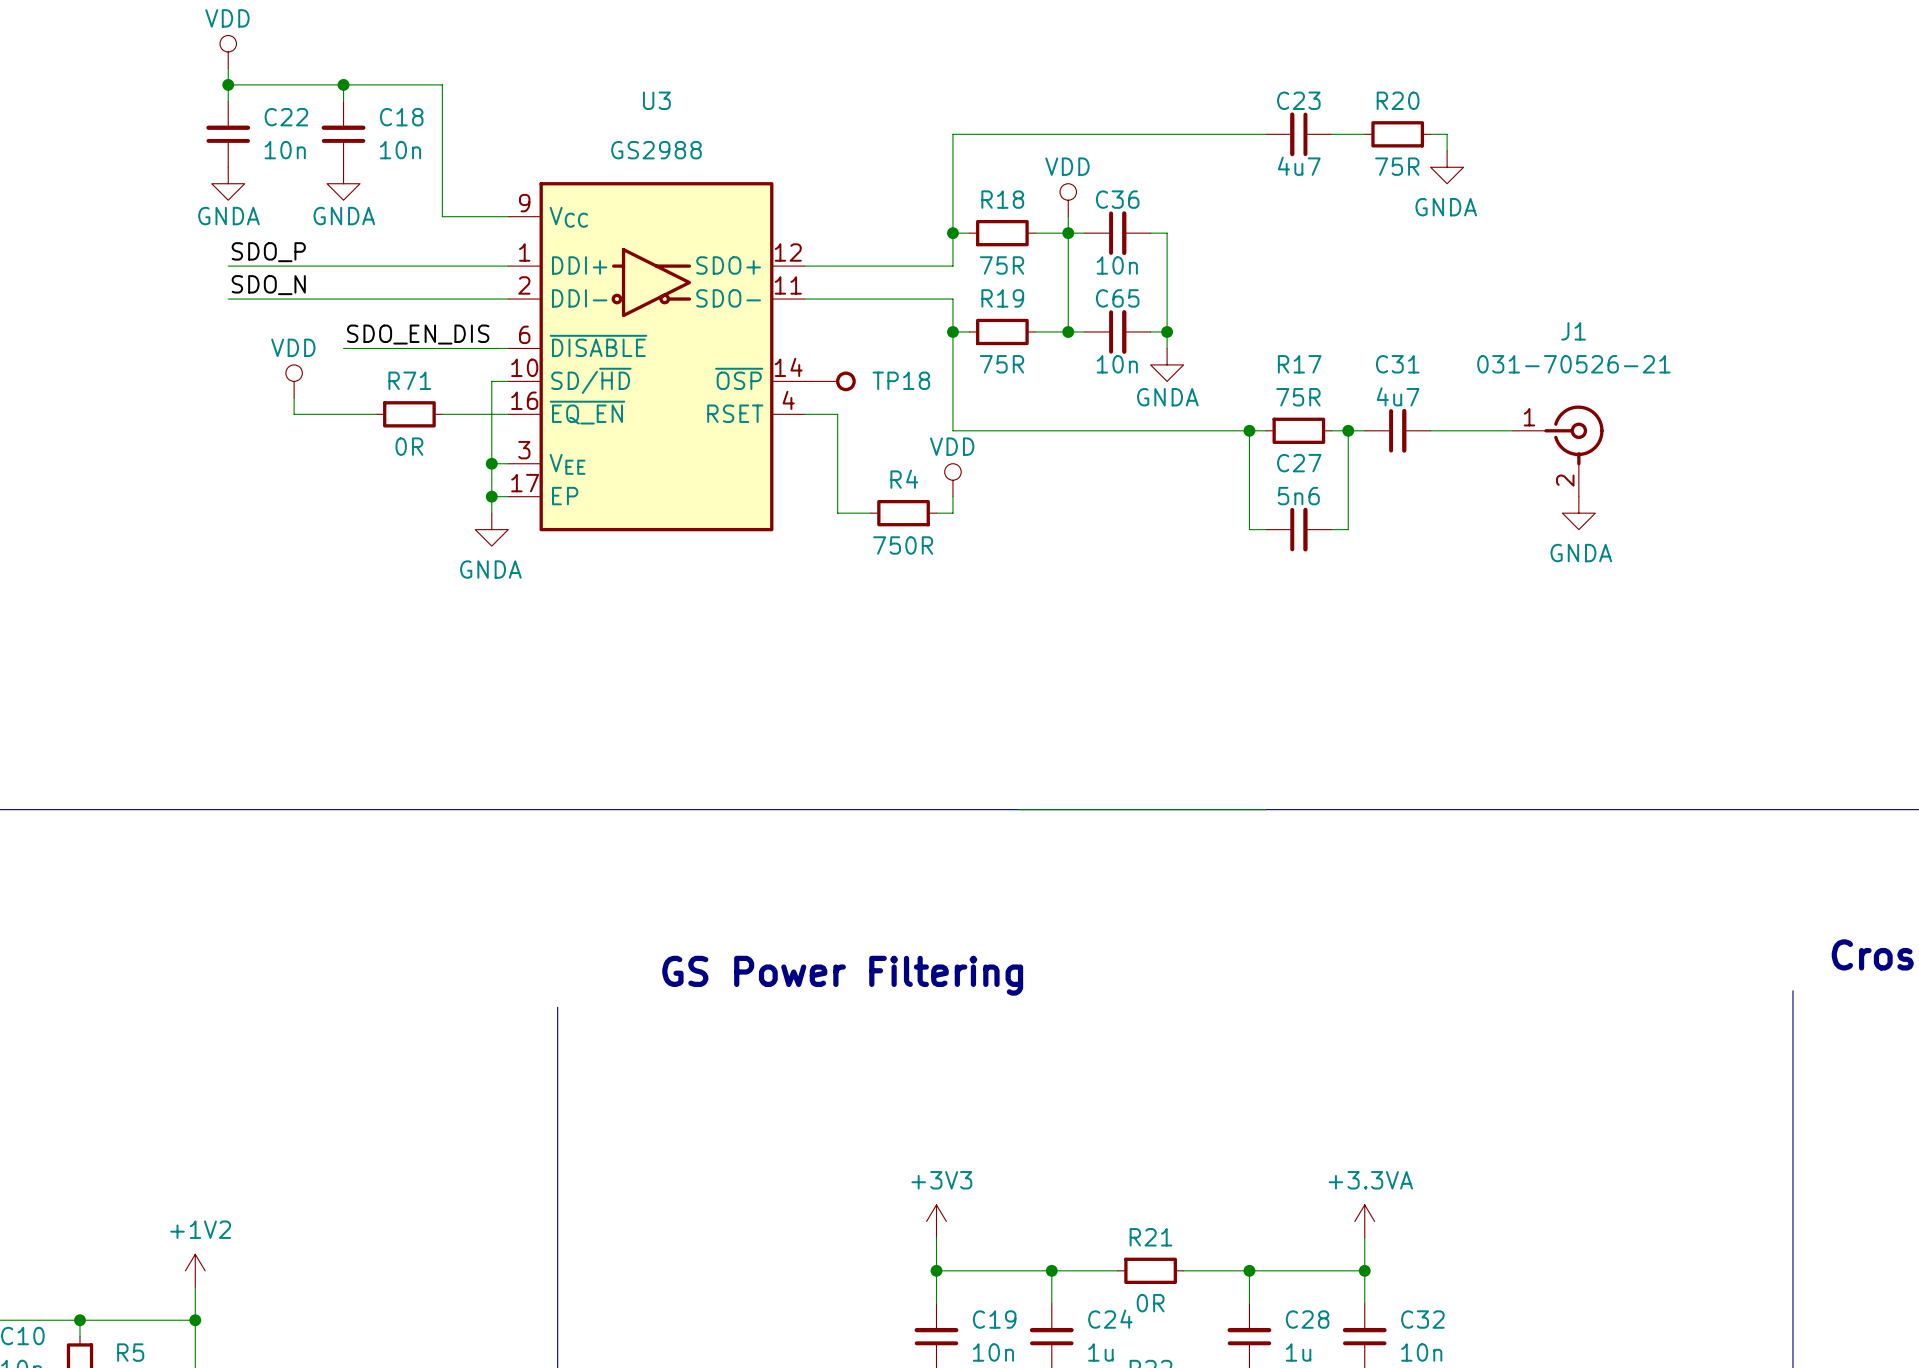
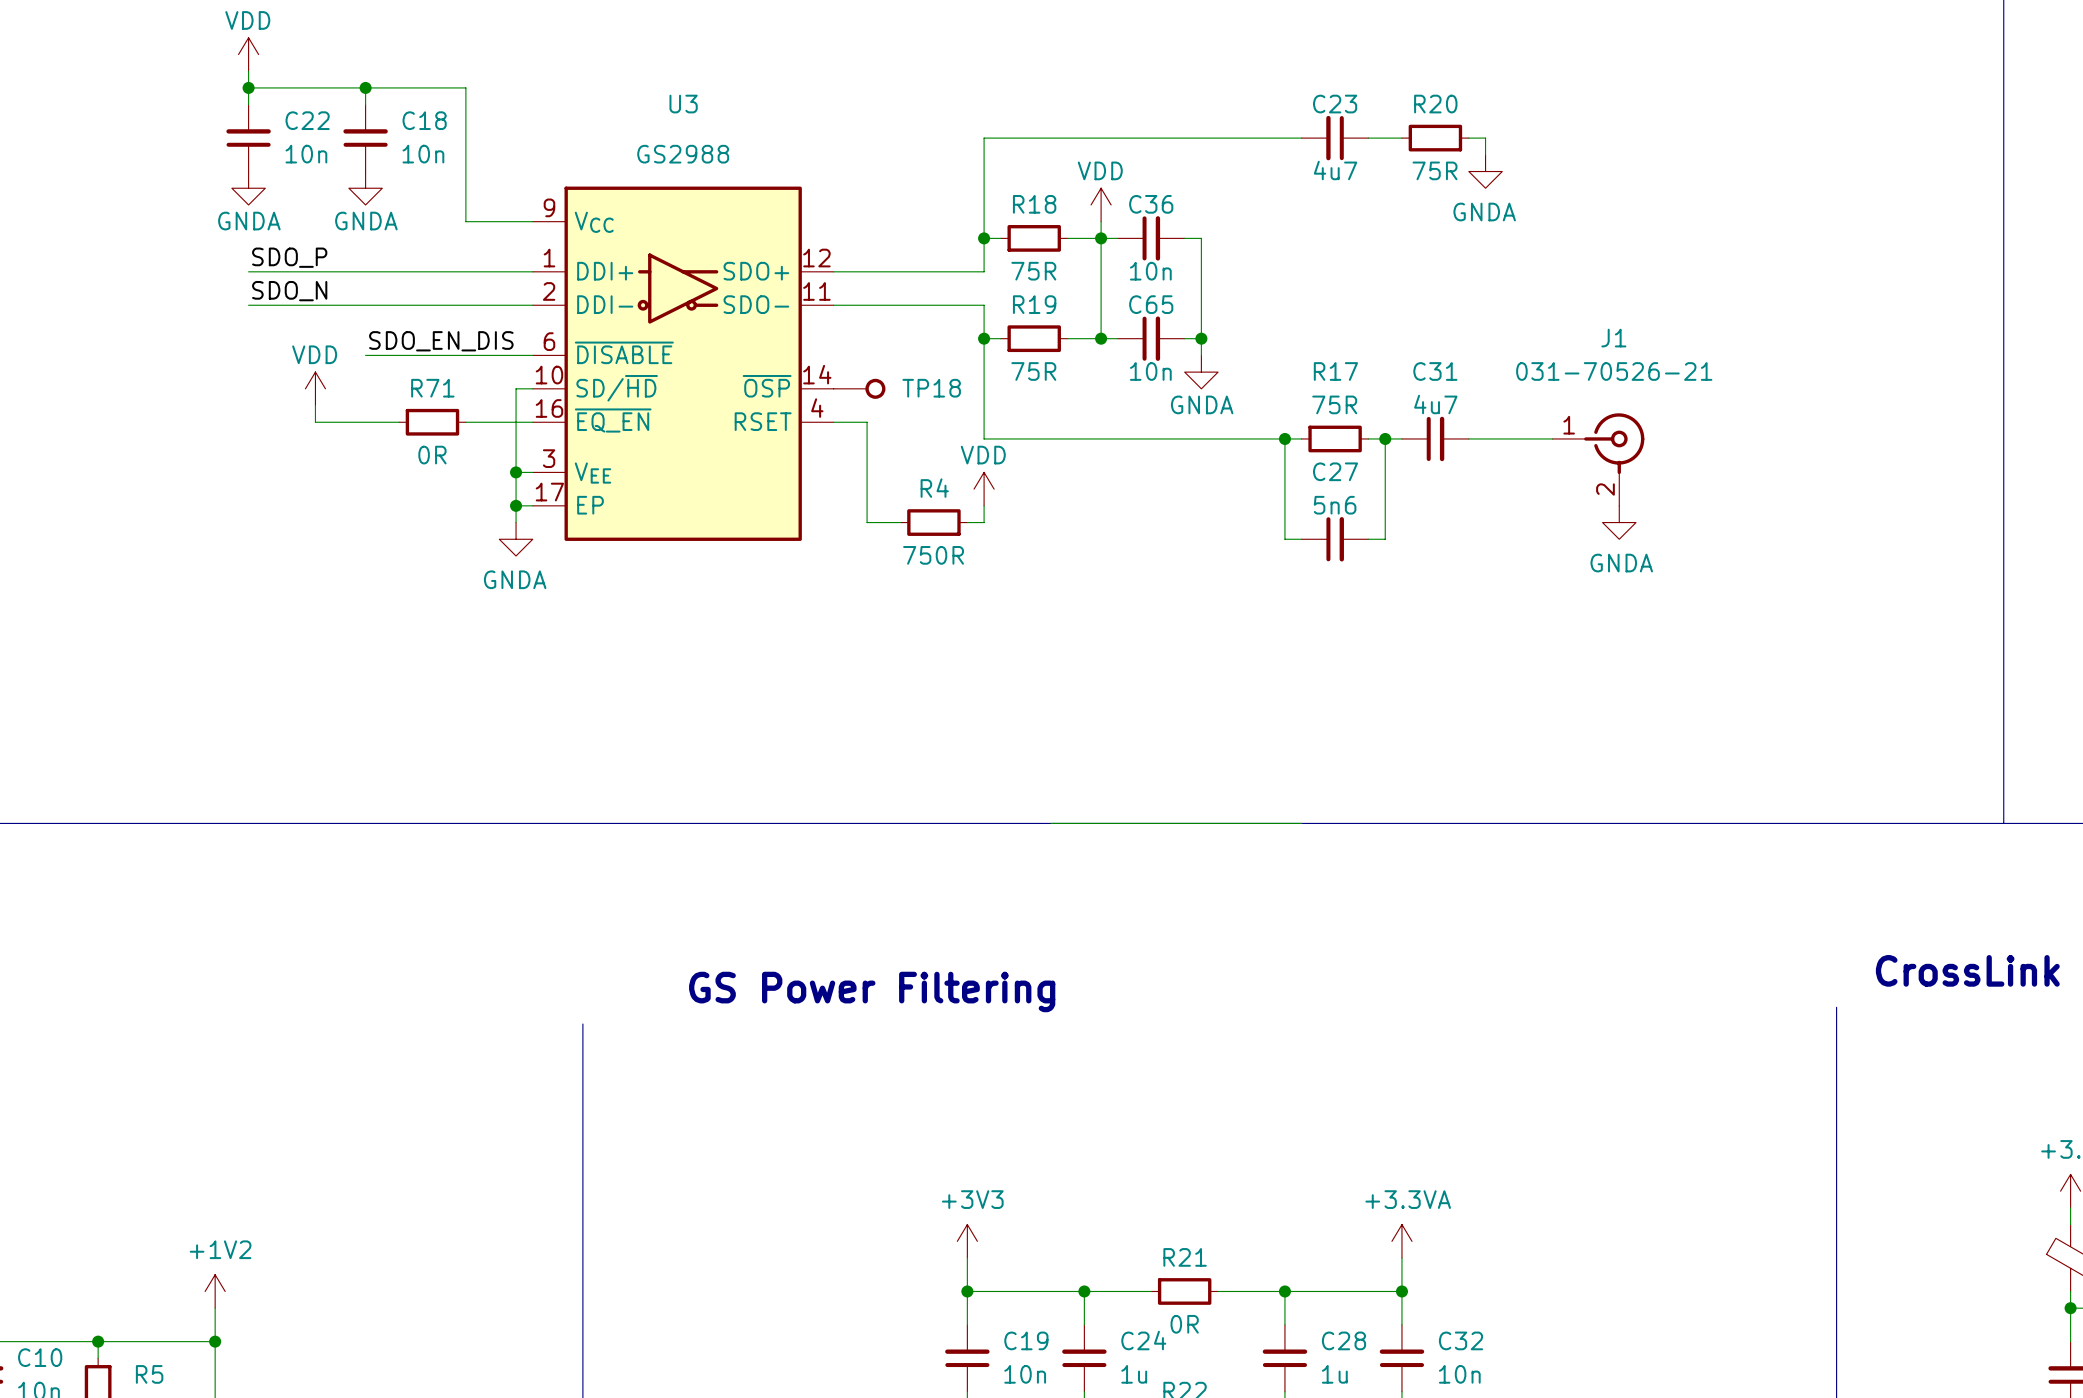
power symbol shape: [220, 35, 237, 69] -> [238, 37, 259, 72]
power symbol shape: [1060, 183, 1077, 217] -> [1091, 188, 1112, 222]
power symbol shape: [285, 364, 303, 398] -> [305, 372, 326, 406]
power symbol shape: [944, 463, 962, 497] -> [974, 472, 995, 506]

